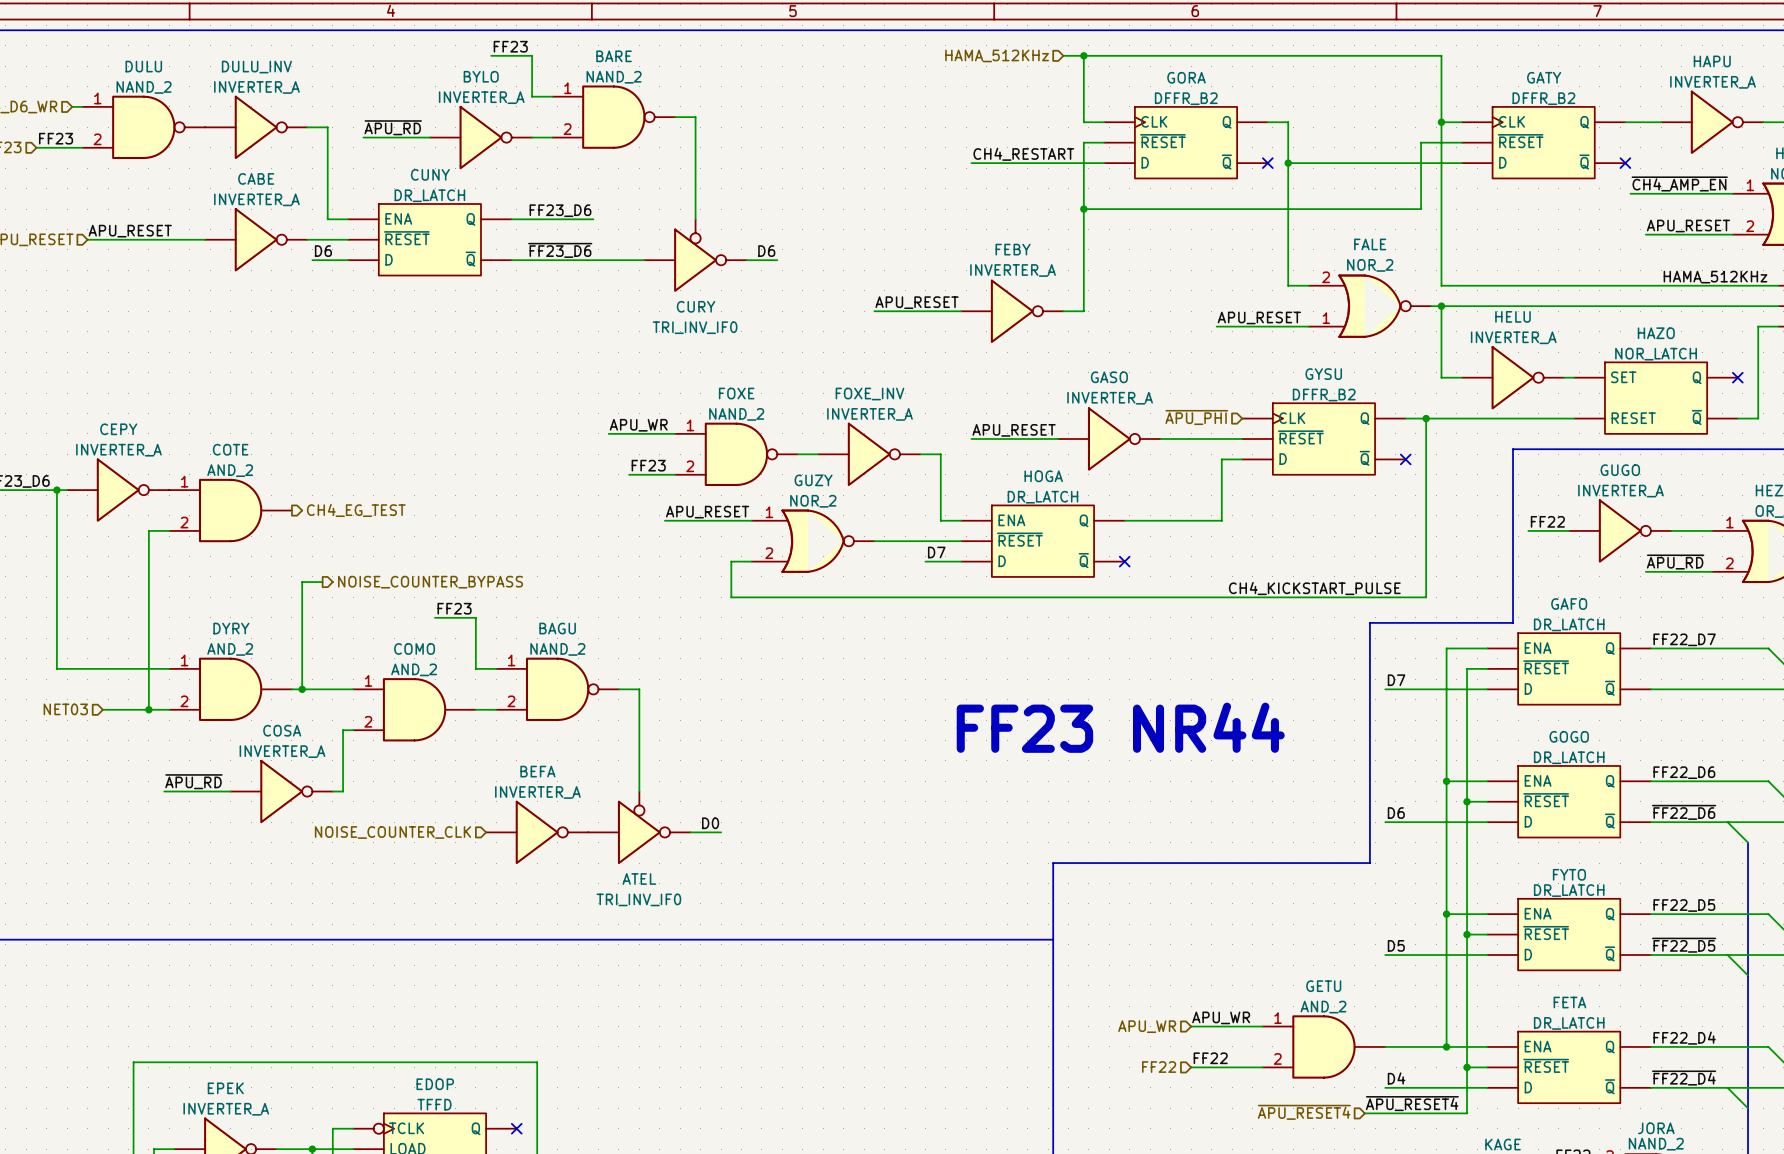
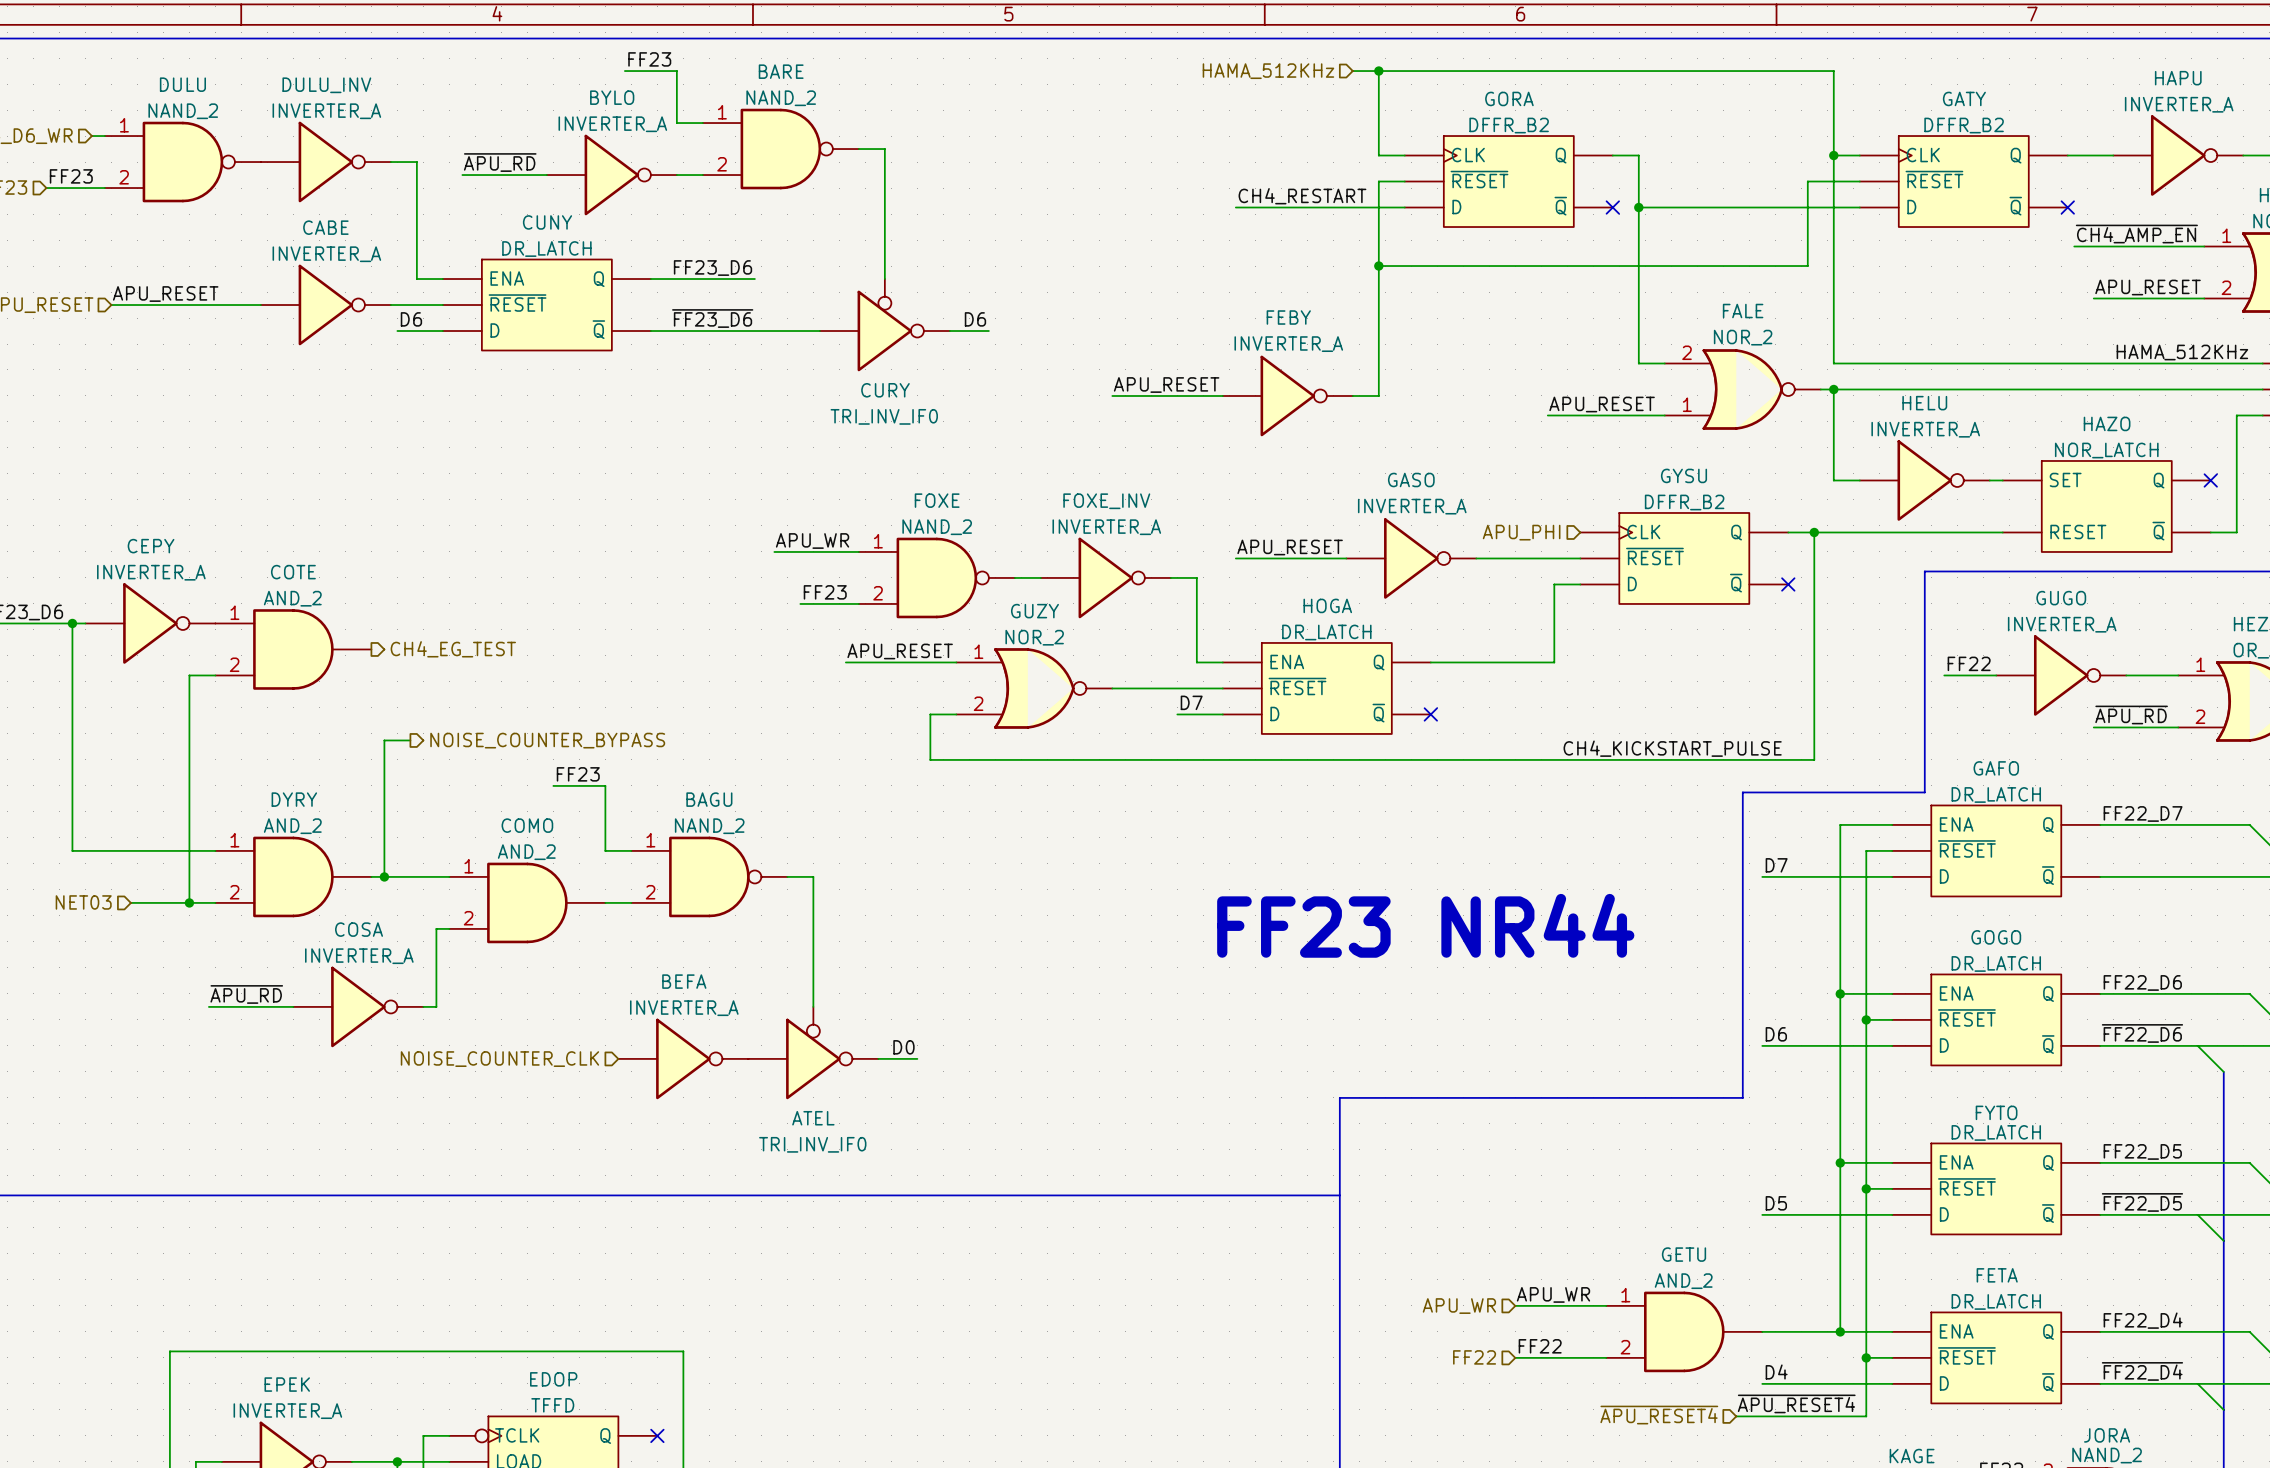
hierarchical label: ~{APU_PHI} (1196, 417) -> APU_PHI (1521, 532)

